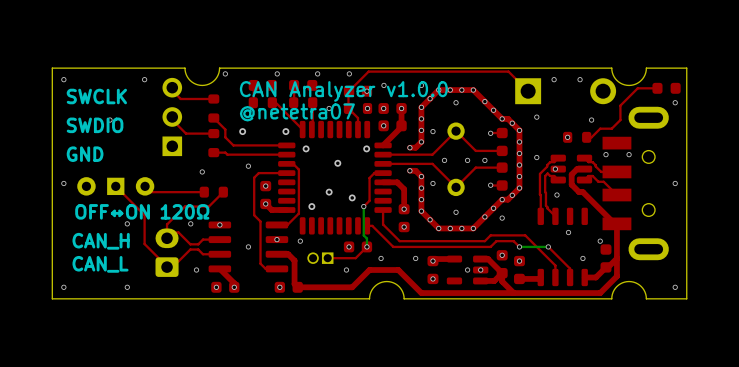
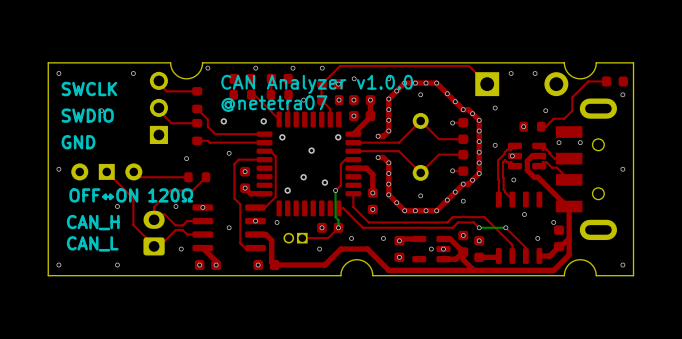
via: (432, 131) -> none
via: (444, 160) -> none
via: (467, 160) -> none
via: (484, 160) -> none
via: (432, 183) -> none

